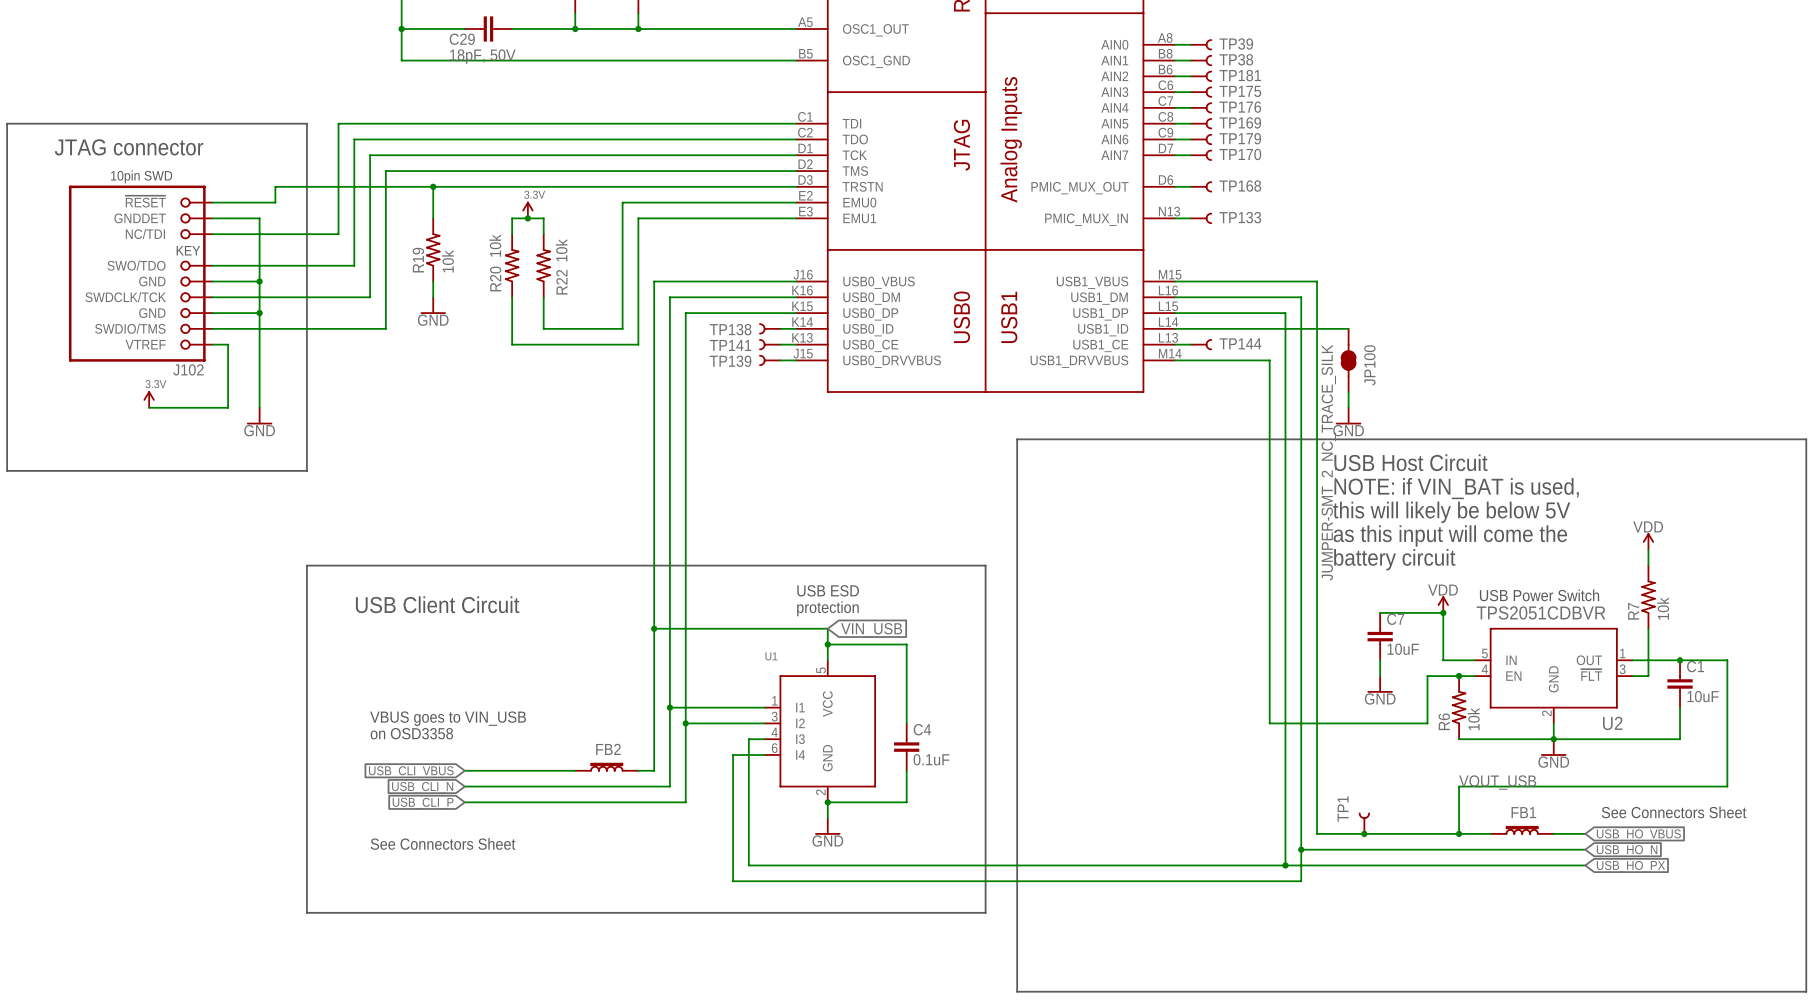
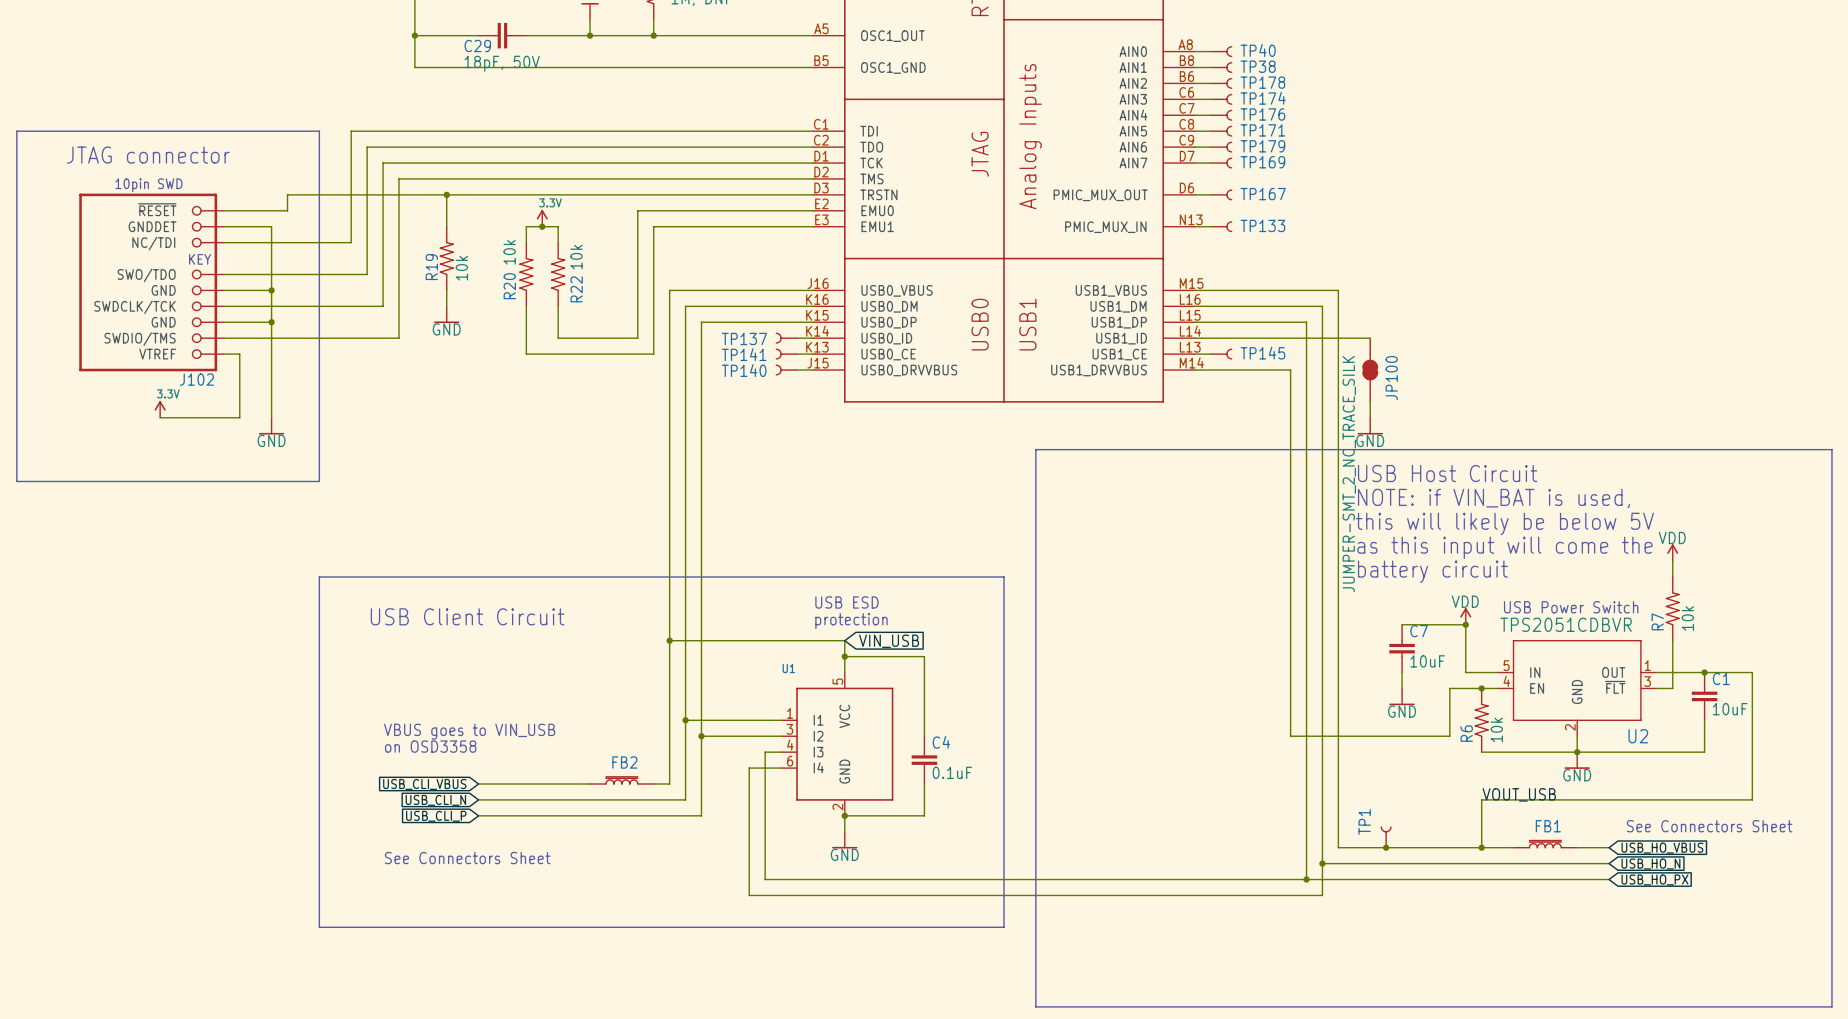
TP39 name: TP39 (1236, 43) -> TP40 (1258, 50)
TP181 name: TP181 (1240, 75) -> TP178 (1262, 82)
TP175 name: TP175 (1240, 91) -> TP174 (1263, 98)
TP169 name: TP169 (1240, 122) -> TP171 (1262, 130)
TP170 name: TP170 (1240, 154) -> TP169 (1262, 162)
TP168 name: TP168 (1240, 186) -> TP167 (1263, 194)
TP138 name: TP138 (730, 329) -> TP137 (744, 338)
TP144 name: TP144 (1240, 343) -> TP145 (1262, 353)
TP139 name: TP139 (730, 361) -> TP140 (744, 370)

